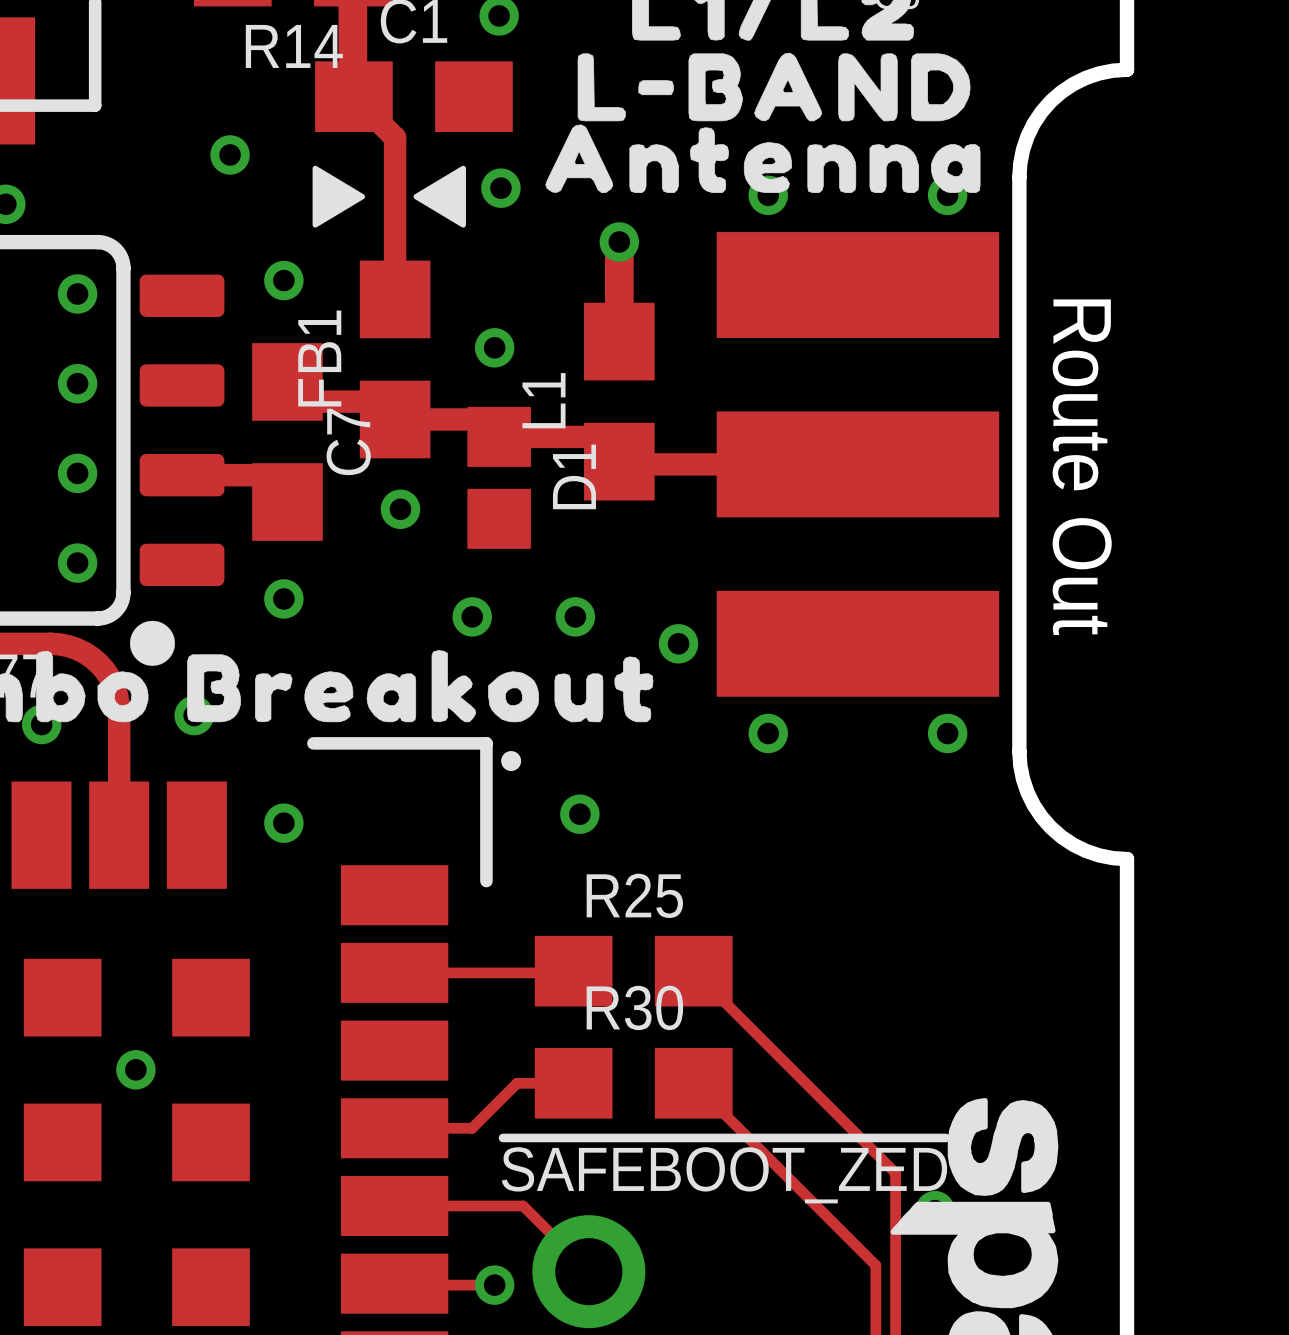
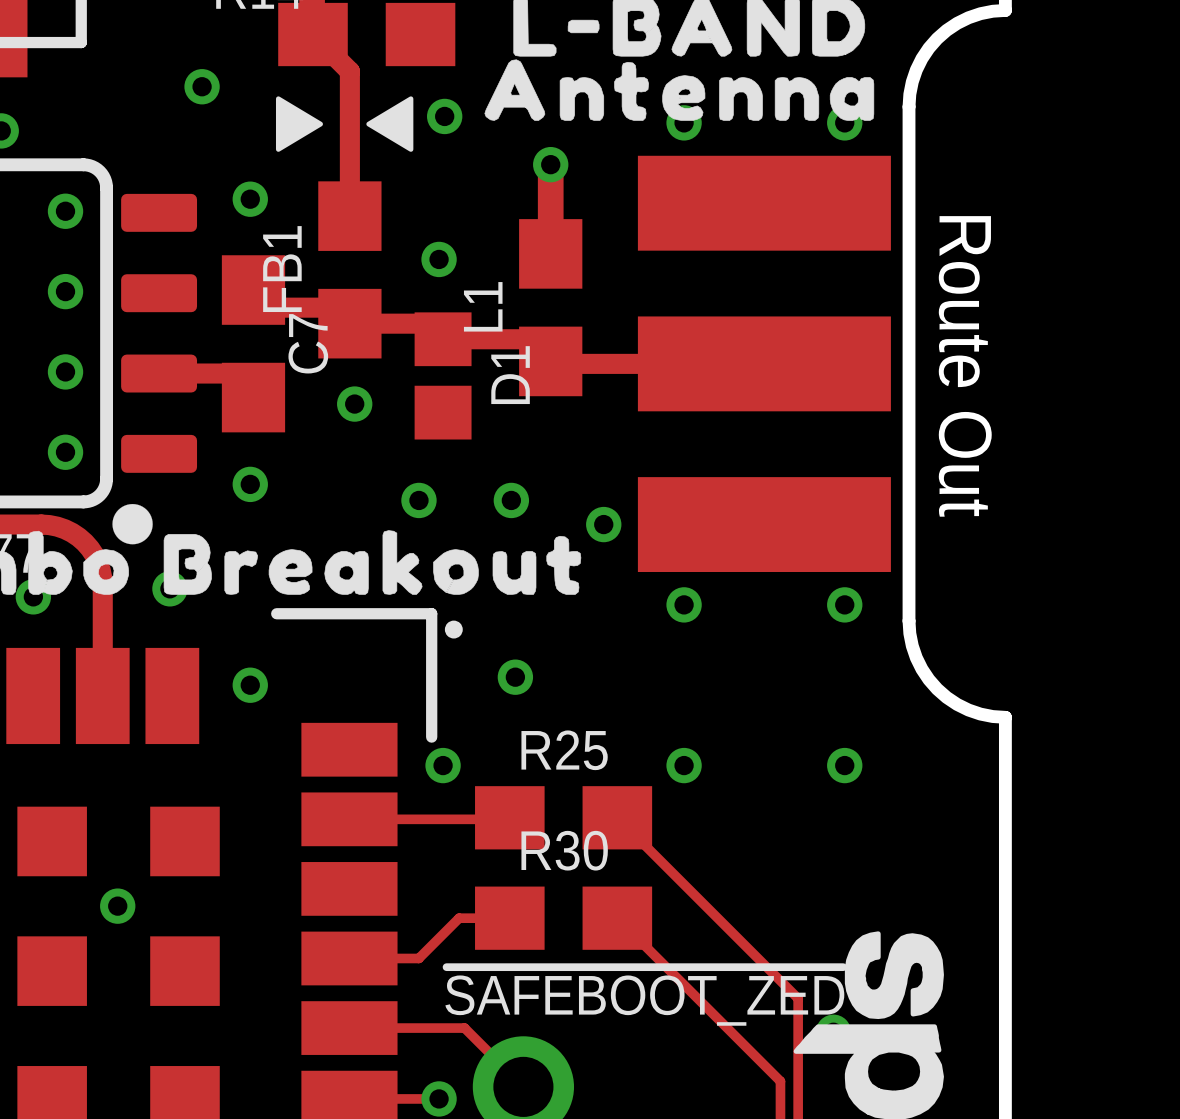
via: none -> (443, 765)
via: none -> (684, 765)
via: none -> (844, 765)

